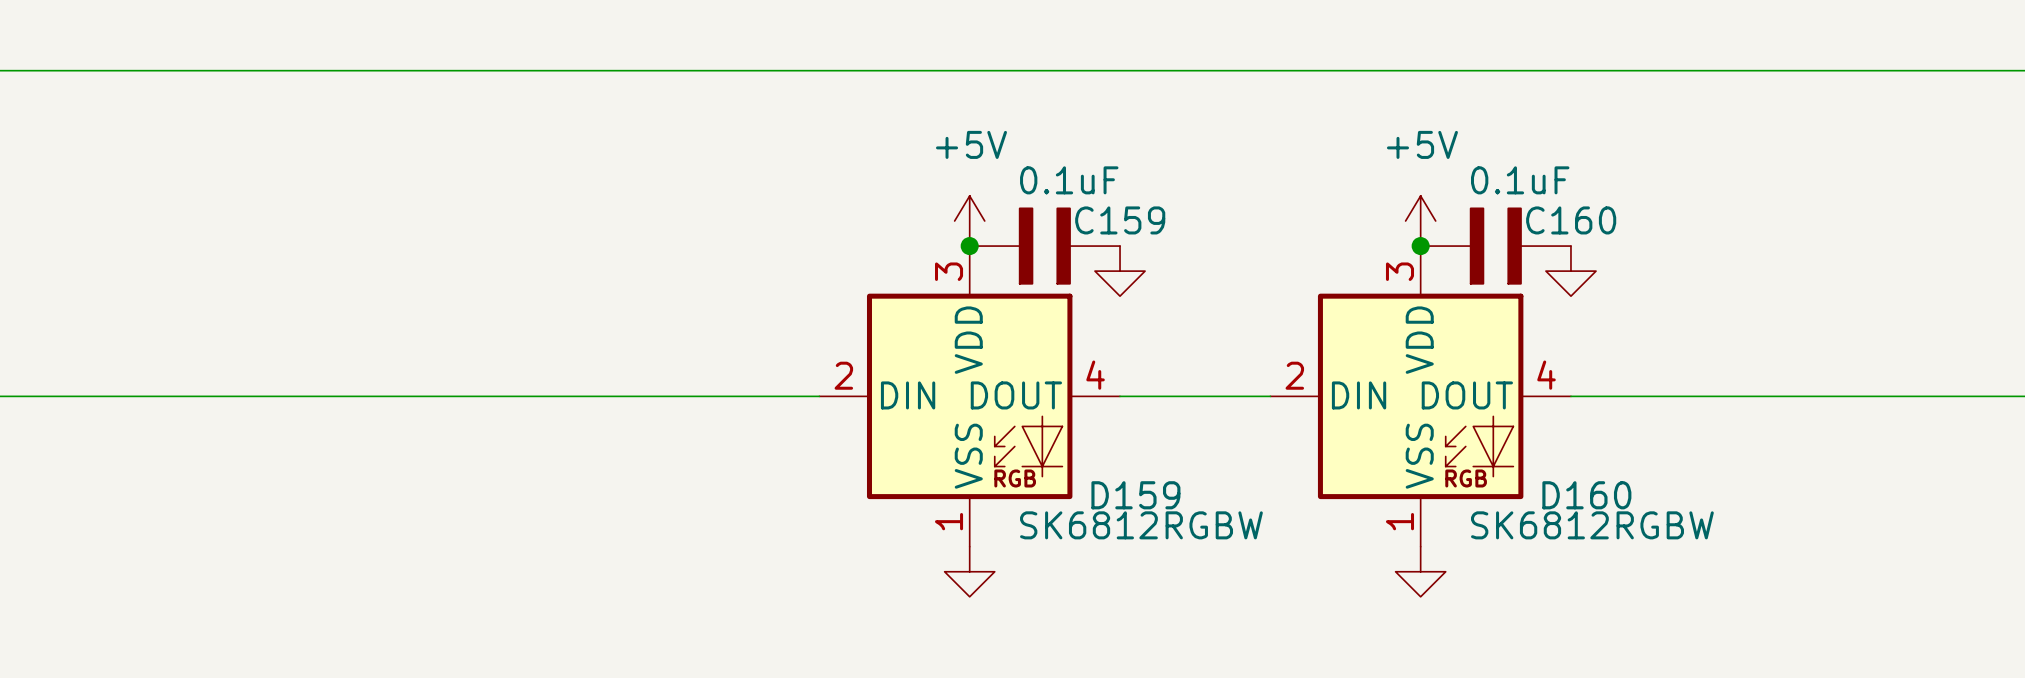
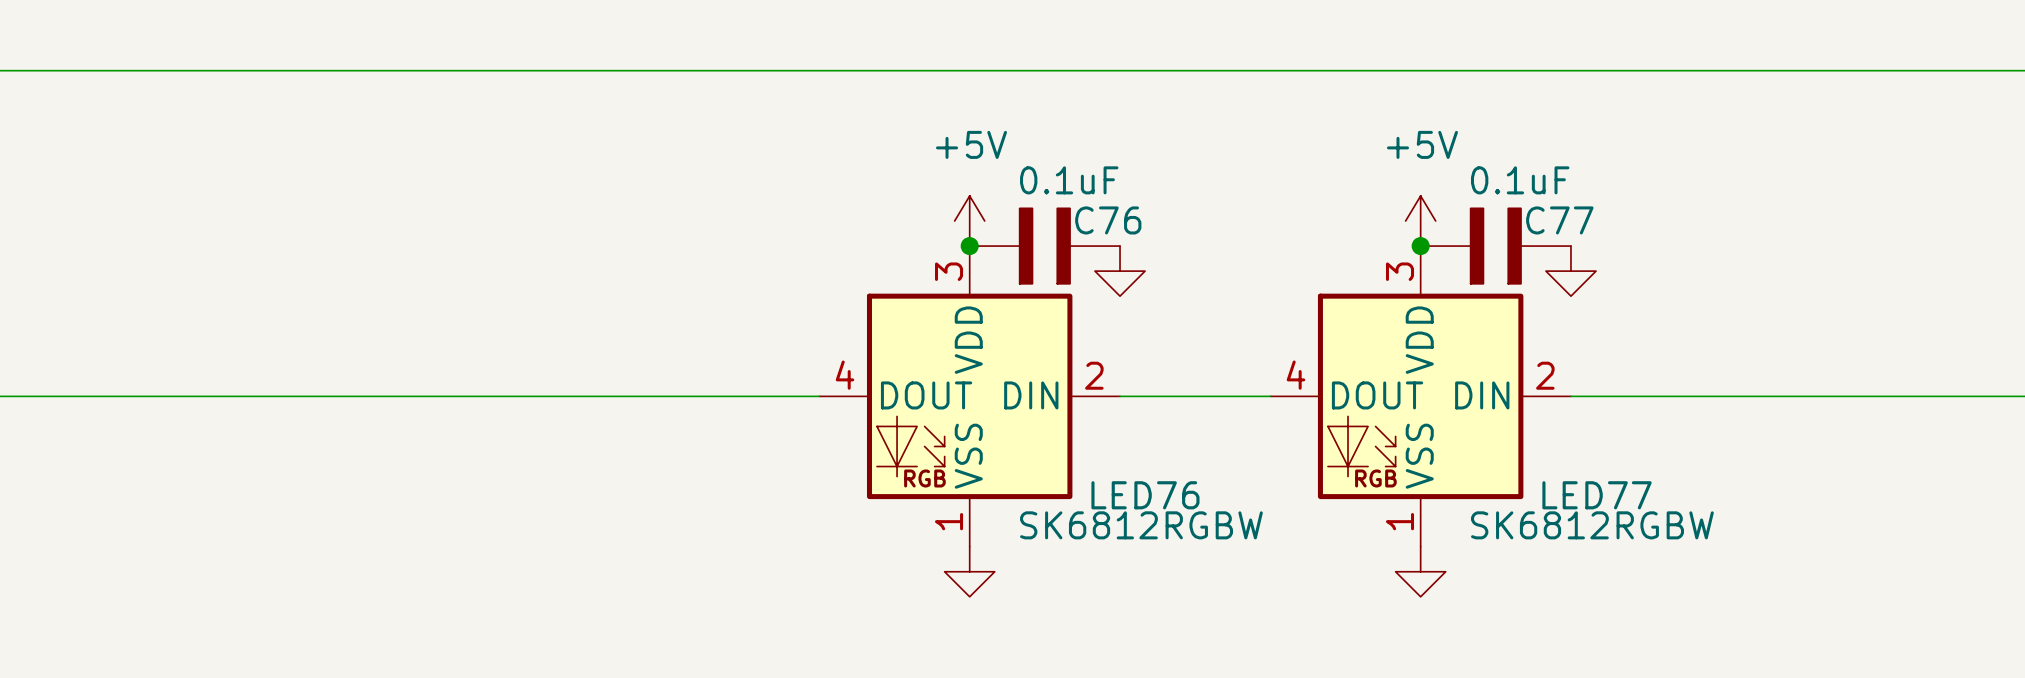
C159 name: C159 (1120, 220) -> C76 (1108, 220)
C160 name: C160 (1571, 220) -> C77 (1559, 220)
D159: SK6812RGBW (969, 396) -> none
LED76: none -> SK6812RGBW (969, 396)
D160: SK6812RGBW (1420, 396) -> none
LED77: none -> SK6812RGBW (1420, 396)

